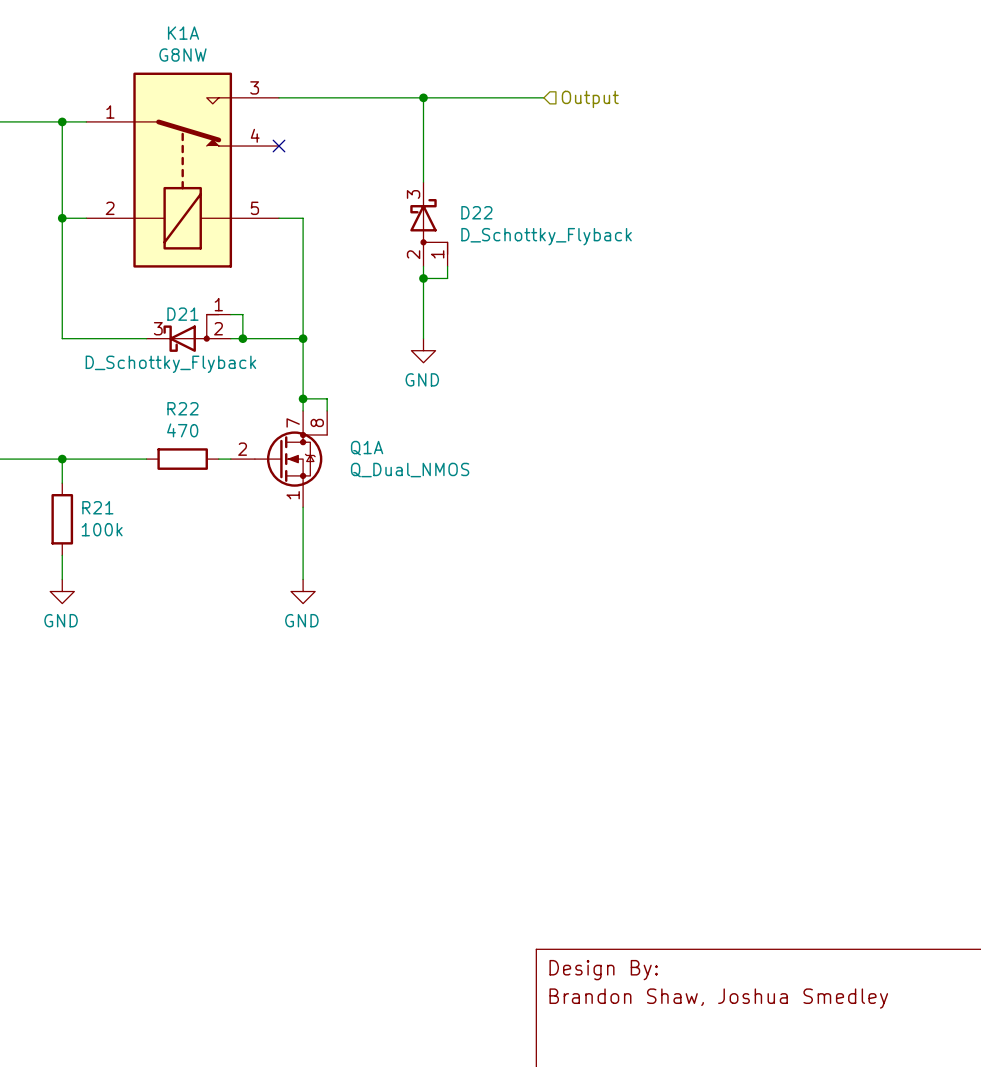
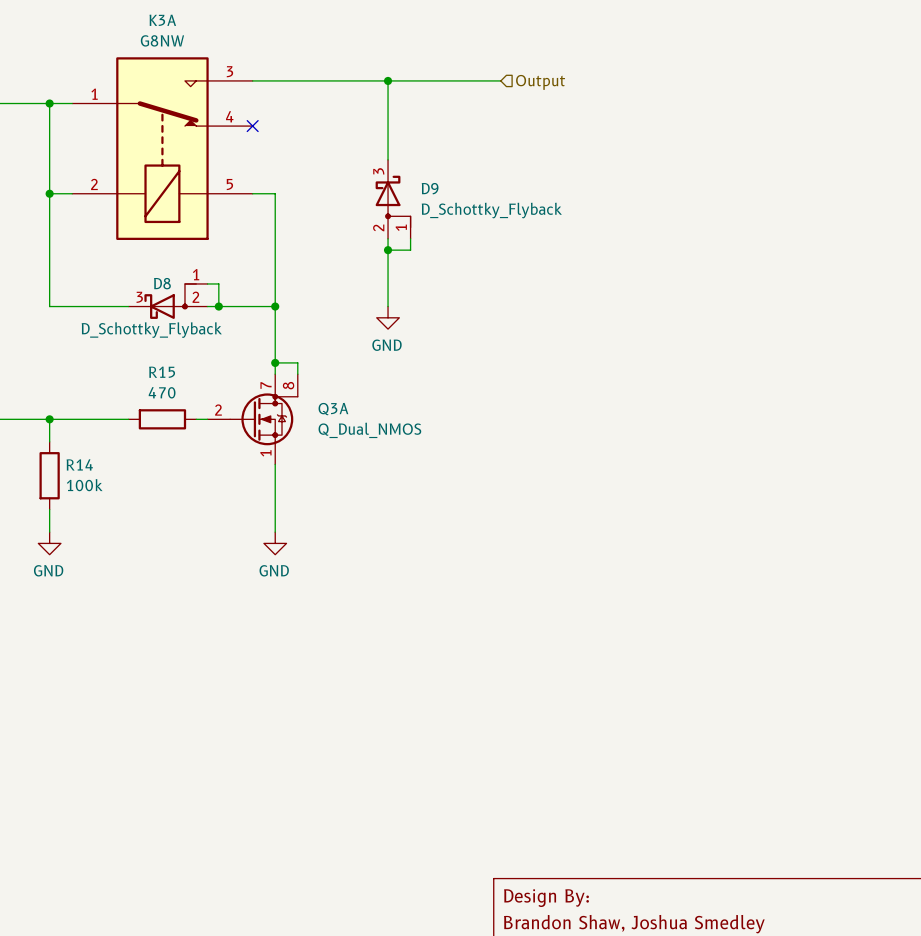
K1A name: K1A (183, 33) -> K3A (162, 20)
D22 name: D22 (476, 212) -> D9 (430, 188)
D21 name: D21 (182, 314) -> D8 (162, 283)
R22 name: R22 (182, 408) -> R15 (162, 372)
Q1A name: Q1A (367, 448) -> Q3A (333, 409)
R21 name: R21 (97, 507) -> R14 (79, 464)

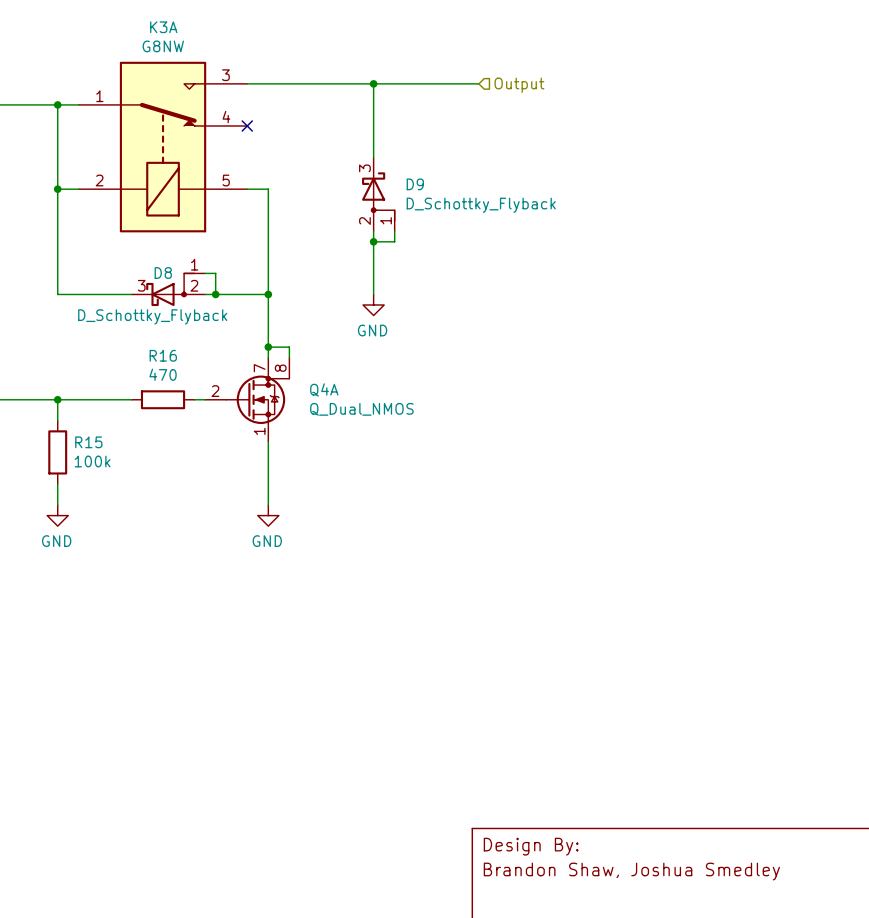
R15 name: R15 (162, 372) -> R16 (163, 355)
Q3A name: Q3A (333, 409) -> Q4A (324, 389)
R14 name: R14 (79, 464) -> R15 (88, 442)

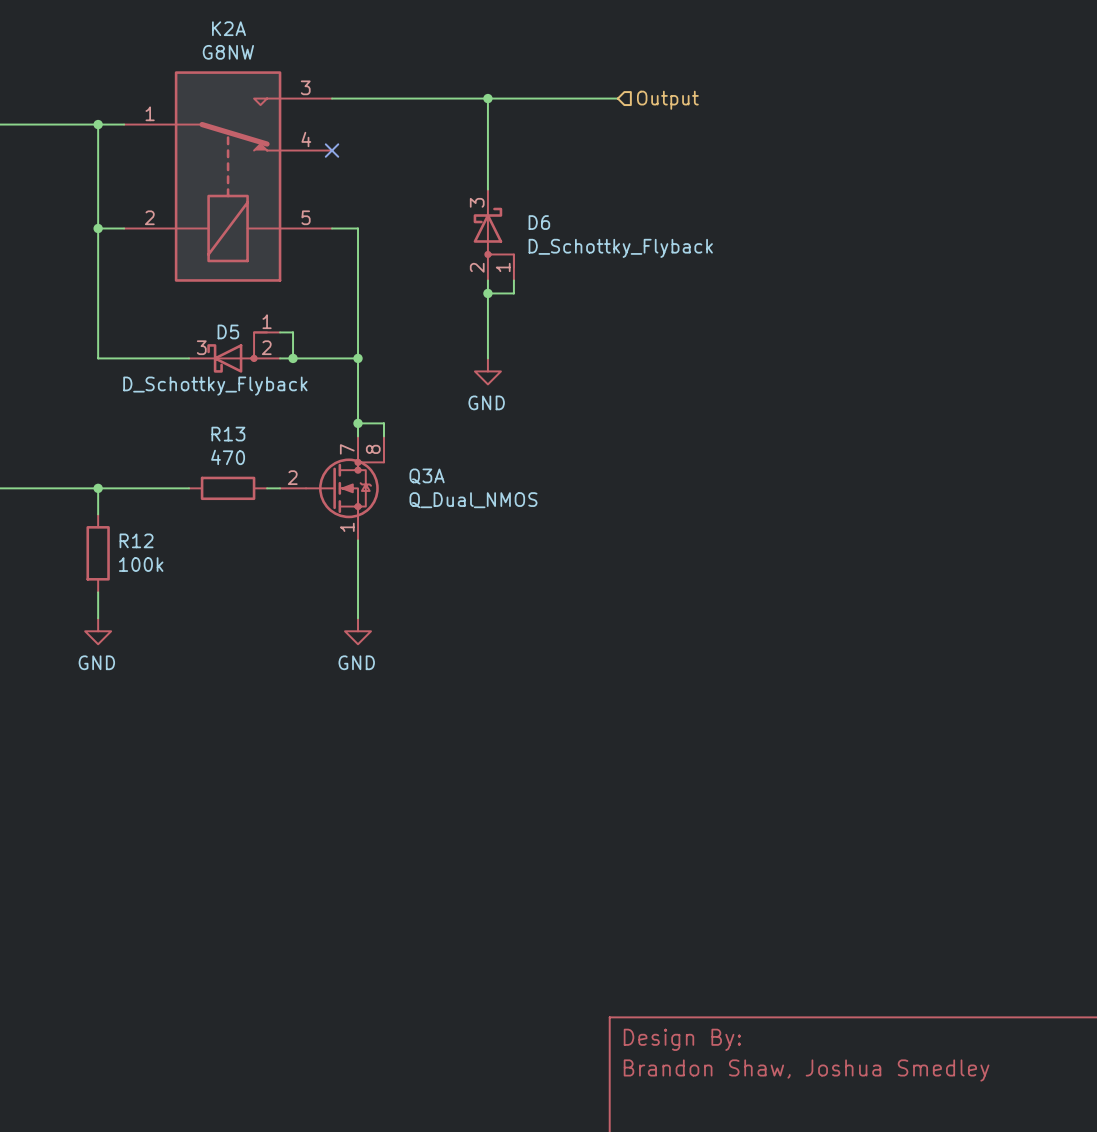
K3A name: K3A (163, 27) -> K2A (229, 28)
D9 name: D9 (415, 184) -> D6 (539, 222)
D8 name: D8 (163, 273) -> D5 (228, 331)
R16 name: R16 (163, 355) -> R13 (228, 434)
Q4A name: Q4A (324, 389) -> Q3A (427, 476)
R15 name: R15 (88, 442) -> R12 (136, 540)

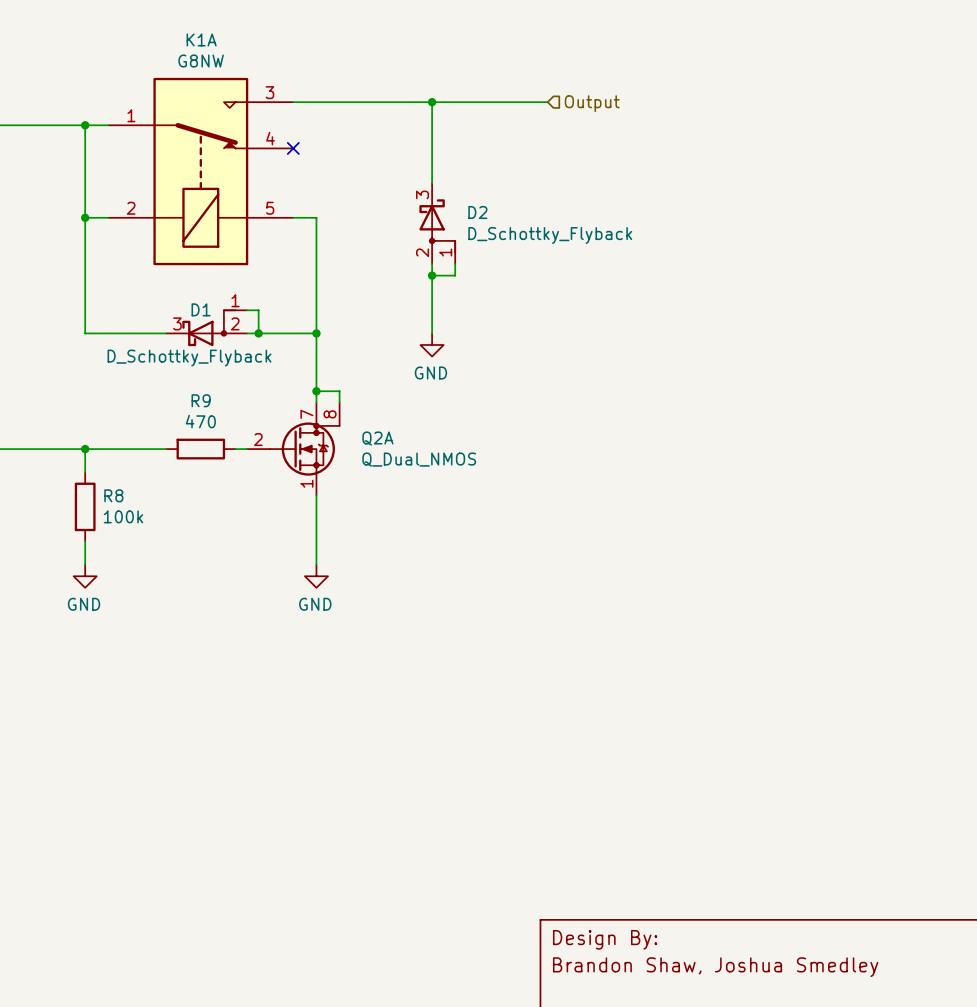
K2A name: K2A (229, 28) -> K1A (201, 39)
D6 name: D6 (539, 222) -> D2 (477, 212)
D5 name: D5 (228, 331) -> D1 (201, 309)
R13 name: R13 (228, 434) -> R9 (201, 400)
Q3A name: Q3A (427, 476) -> Q2A (377, 438)
R12 name: R12 (136, 540) -> R8 (113, 495)

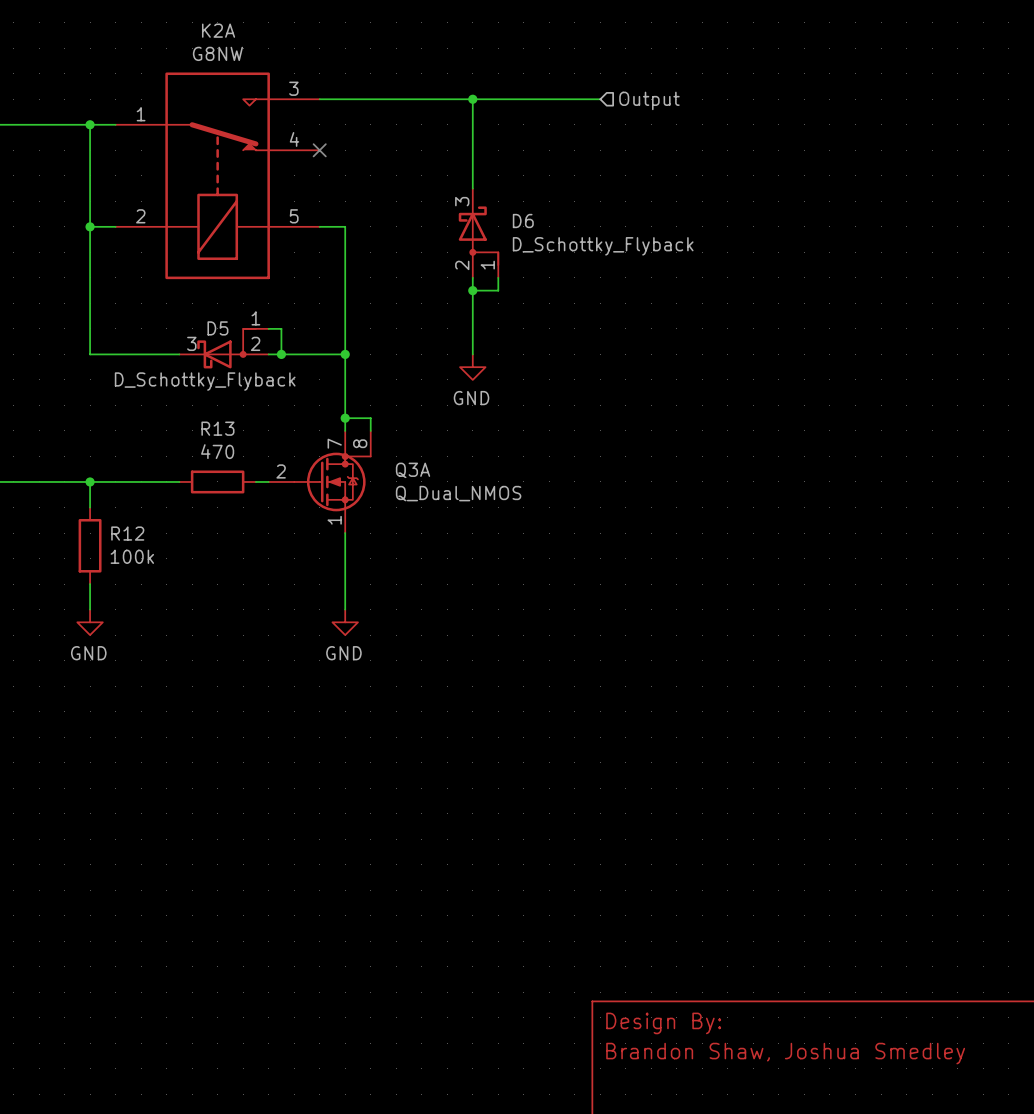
K1A name: K1A (201, 39) -> K2A (218, 30)
D2 name: D2 (477, 212) -> D6 (523, 221)
D1 name: D1 (201, 309) -> D5 (217, 328)
R9 name: R9 (201, 400) -> R13 (217, 428)
Q2A name: Q2A (377, 438) -> Q3A (413, 470)
R8 name: R8 (113, 495) -> R12 (127, 533)

